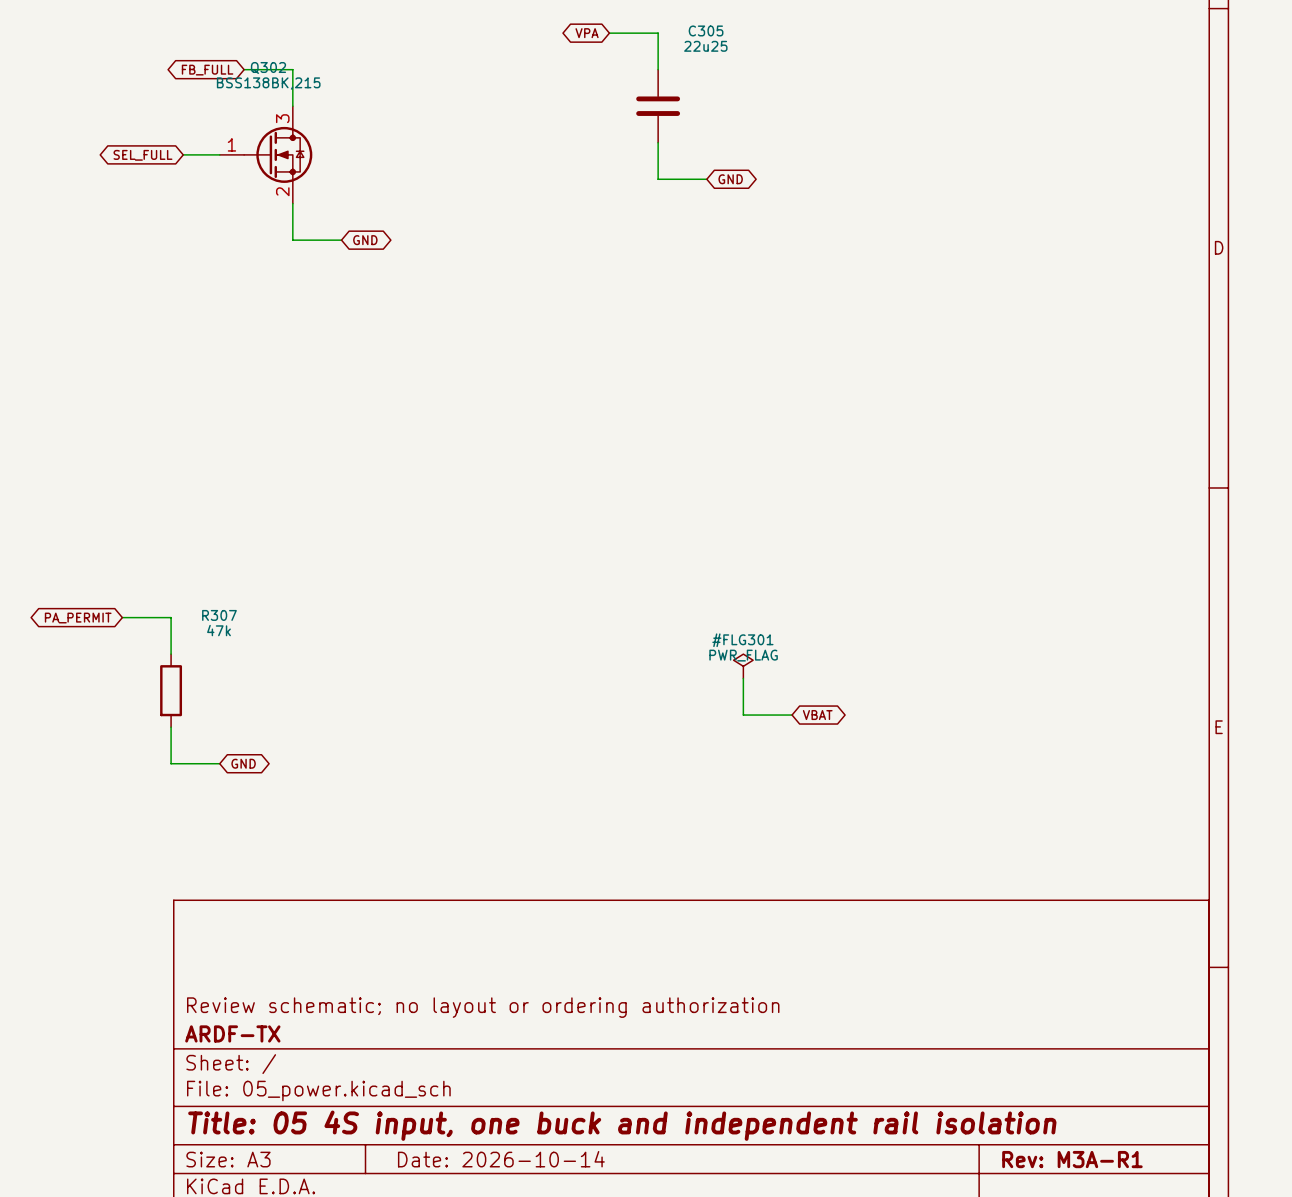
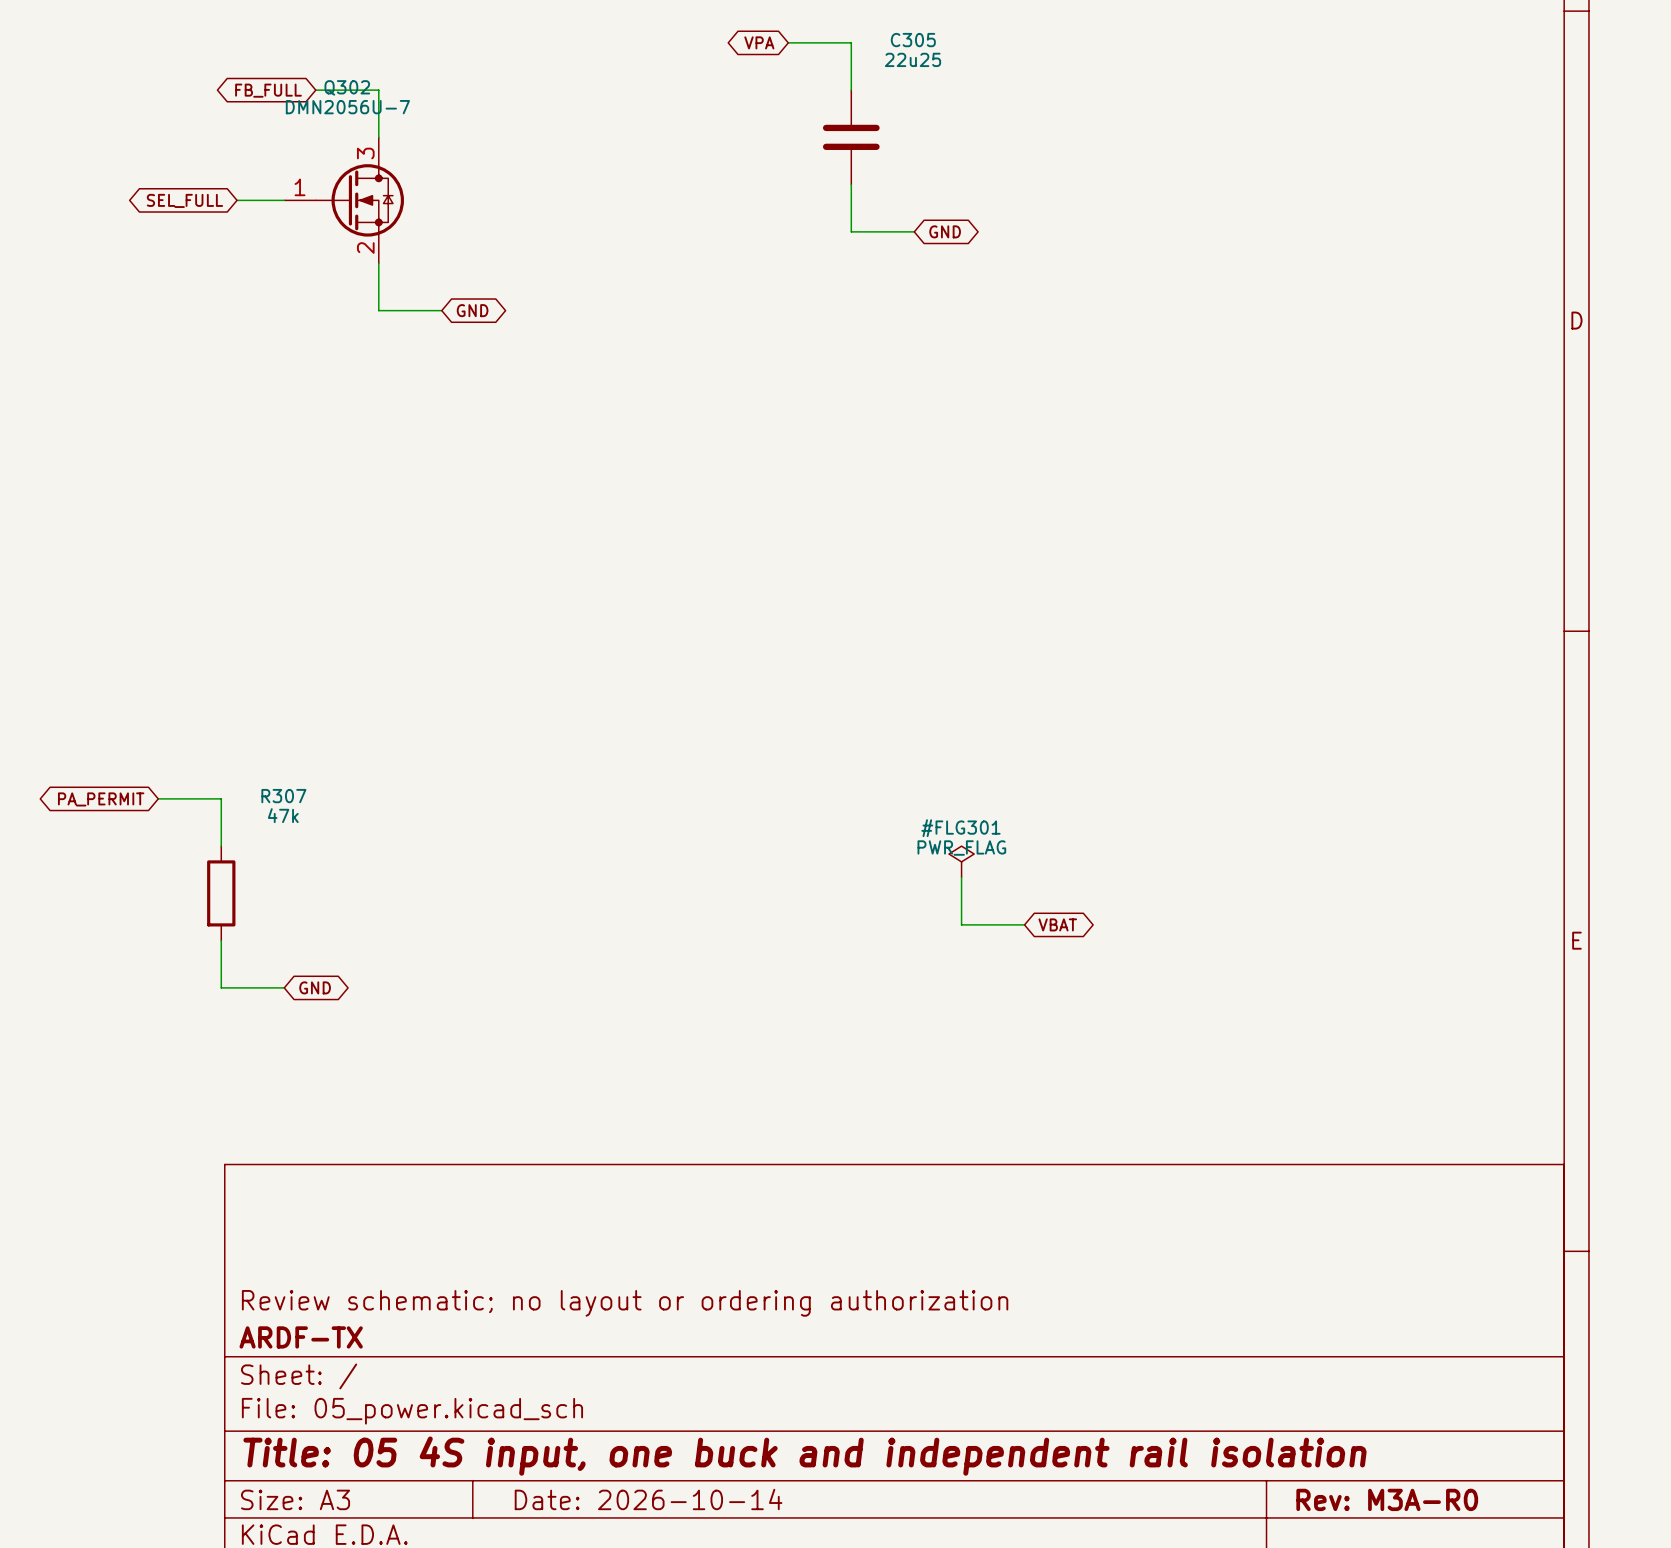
Q302 value: BSS138BK,215 (268, 83) -> DMN2056U-7 (347, 107)
title block: Rev: M3A-R1 (1072, 1159) -> Rev: M3A-R0 (1387, 1499)

